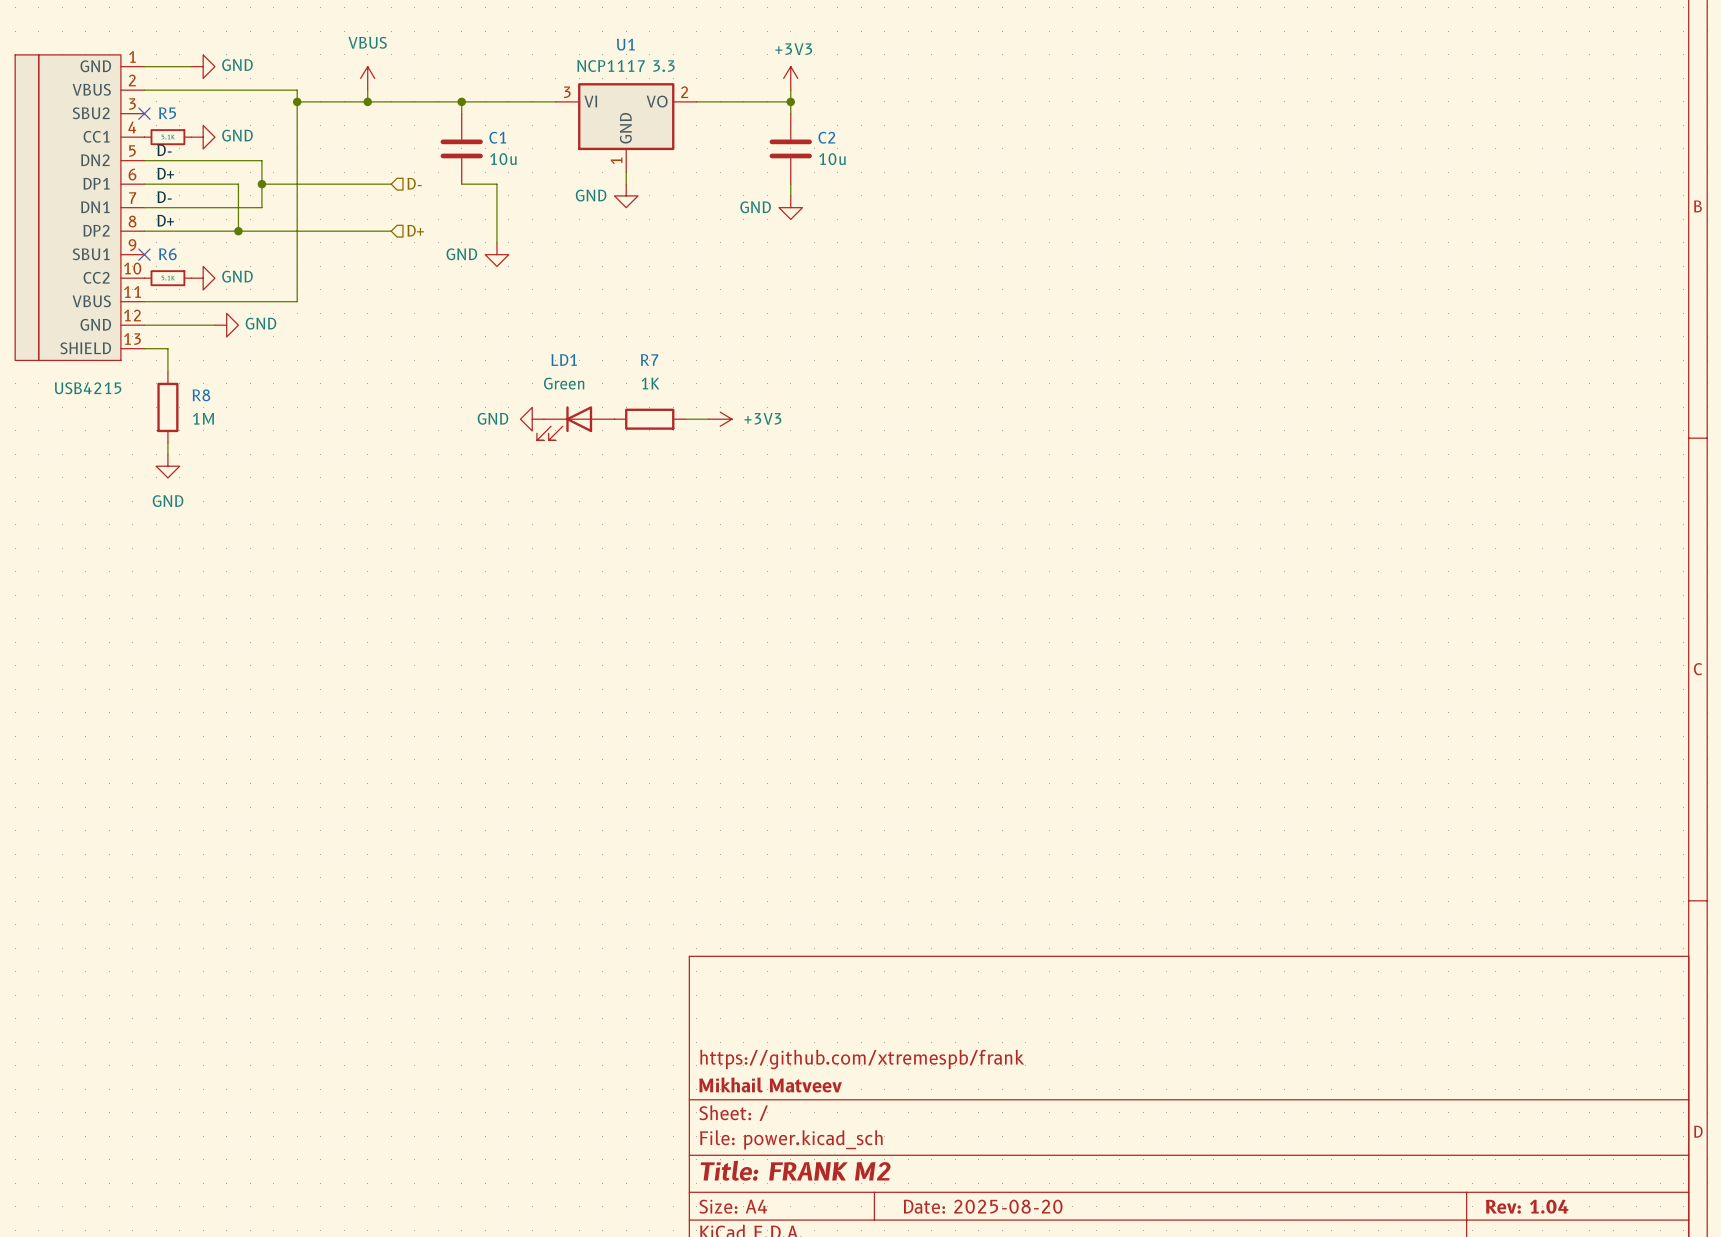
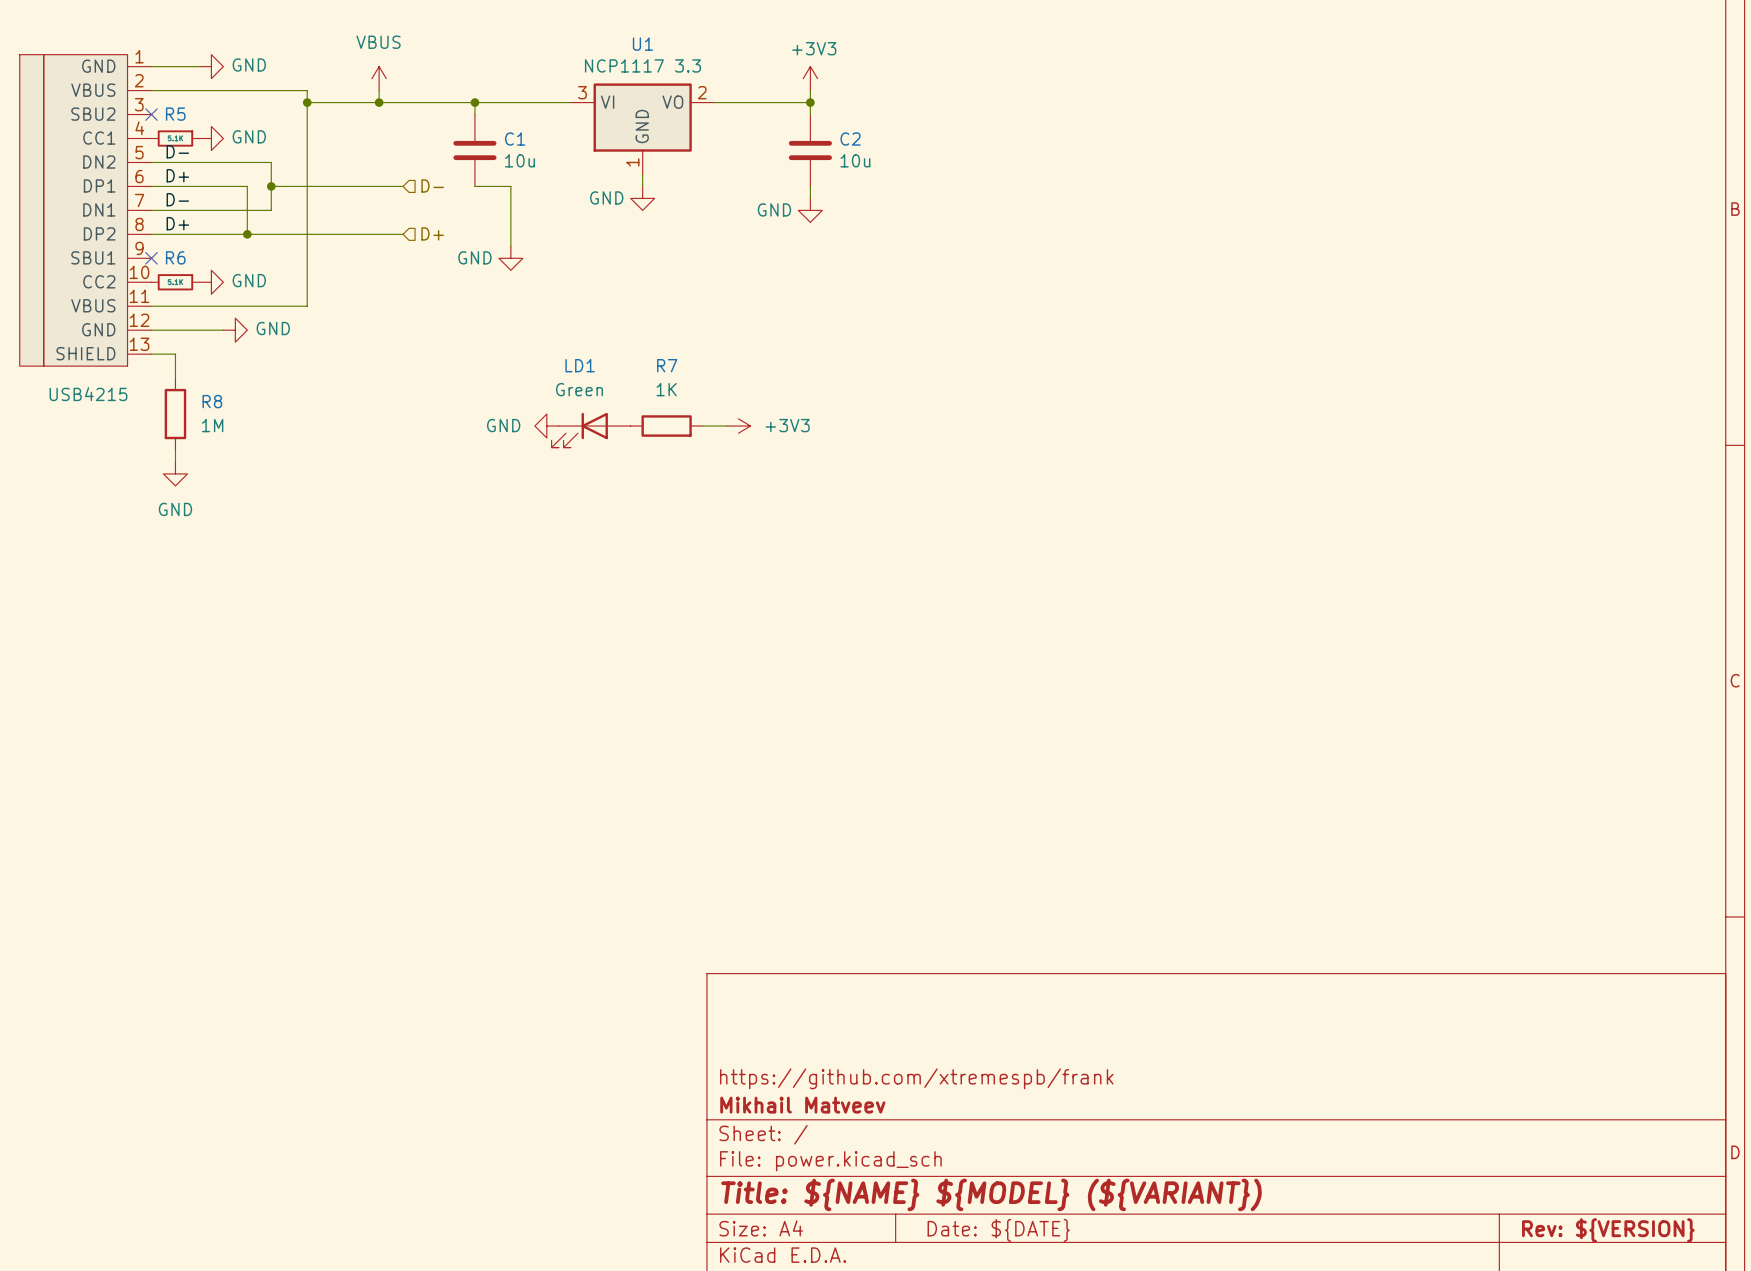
title block: Title: FRANK M2 (795, 1170) -> Title: ${NAME} ${MODEL} (${VARIANT}) (991, 1194)
title block: Date: 2025-08-20 (983, 1206) -> Date: ${DATE} (998, 1230)
title block: Rev: 1.04 (1527, 1206) -> Rev: ${VERSION} (1608, 1230)

